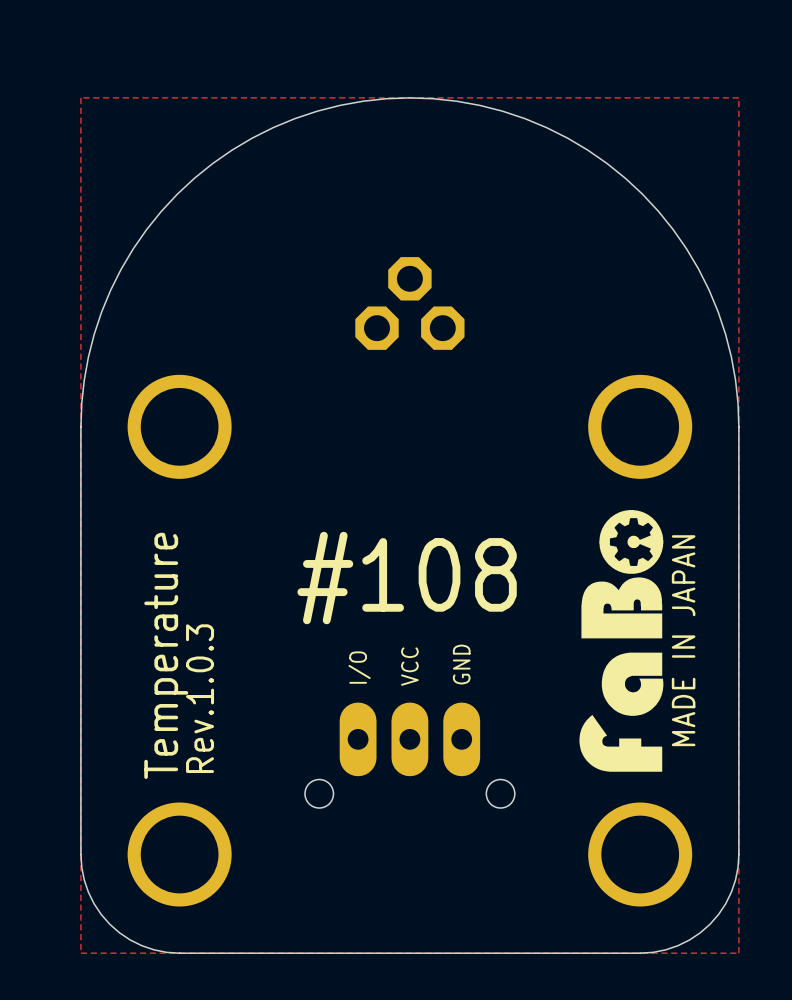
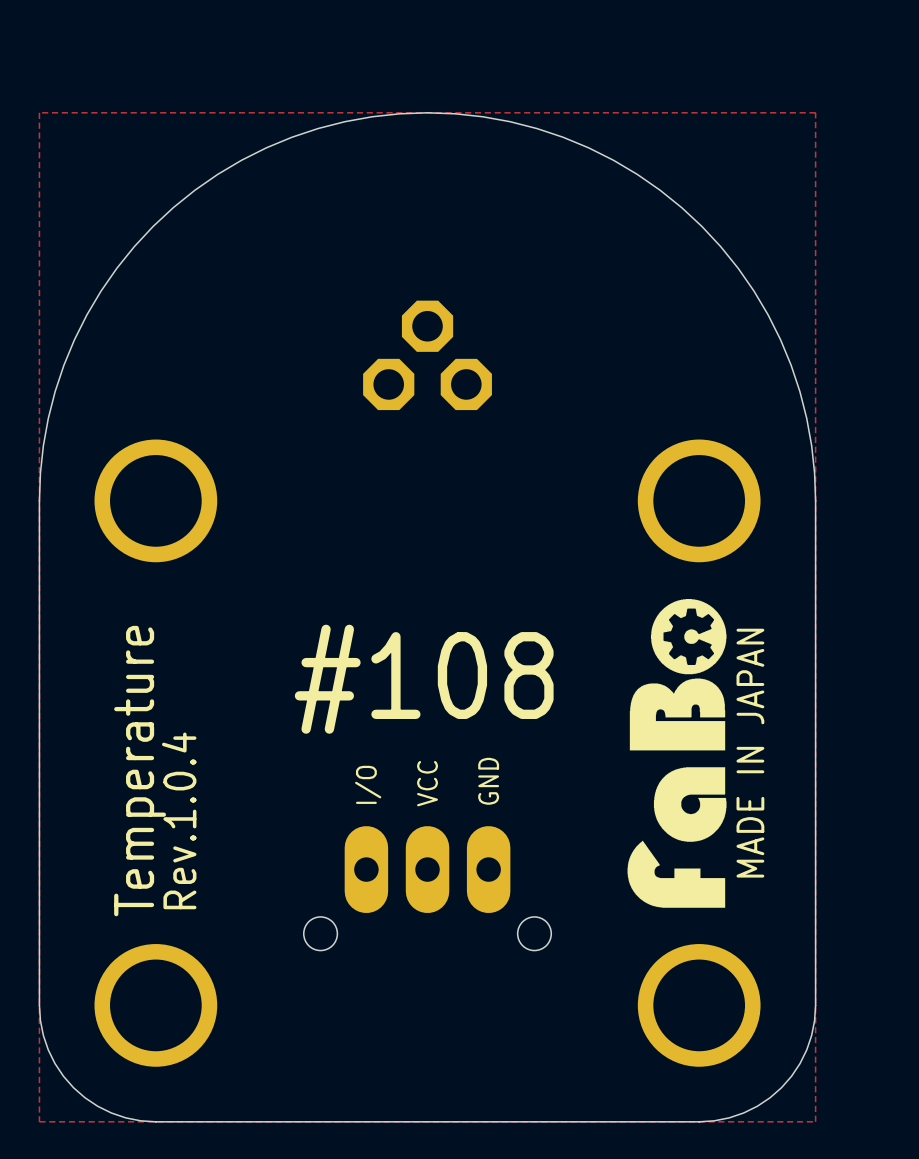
text: Rev.1.0.3 (200, 698) -> Rev.1.0.4 (179, 820)

